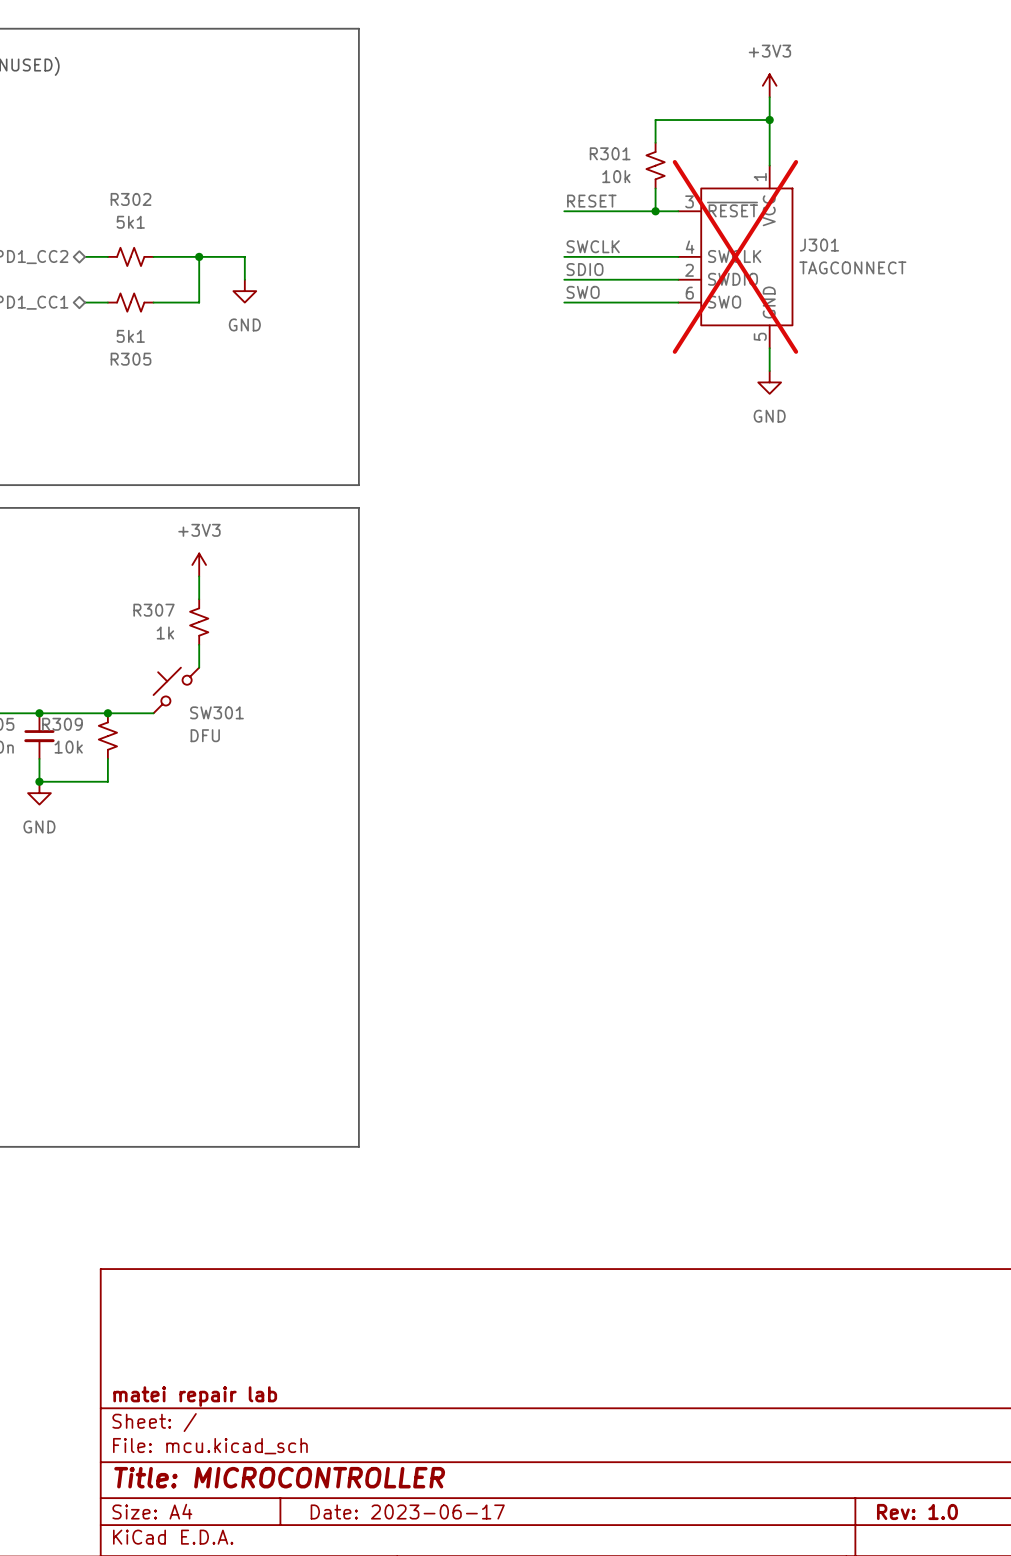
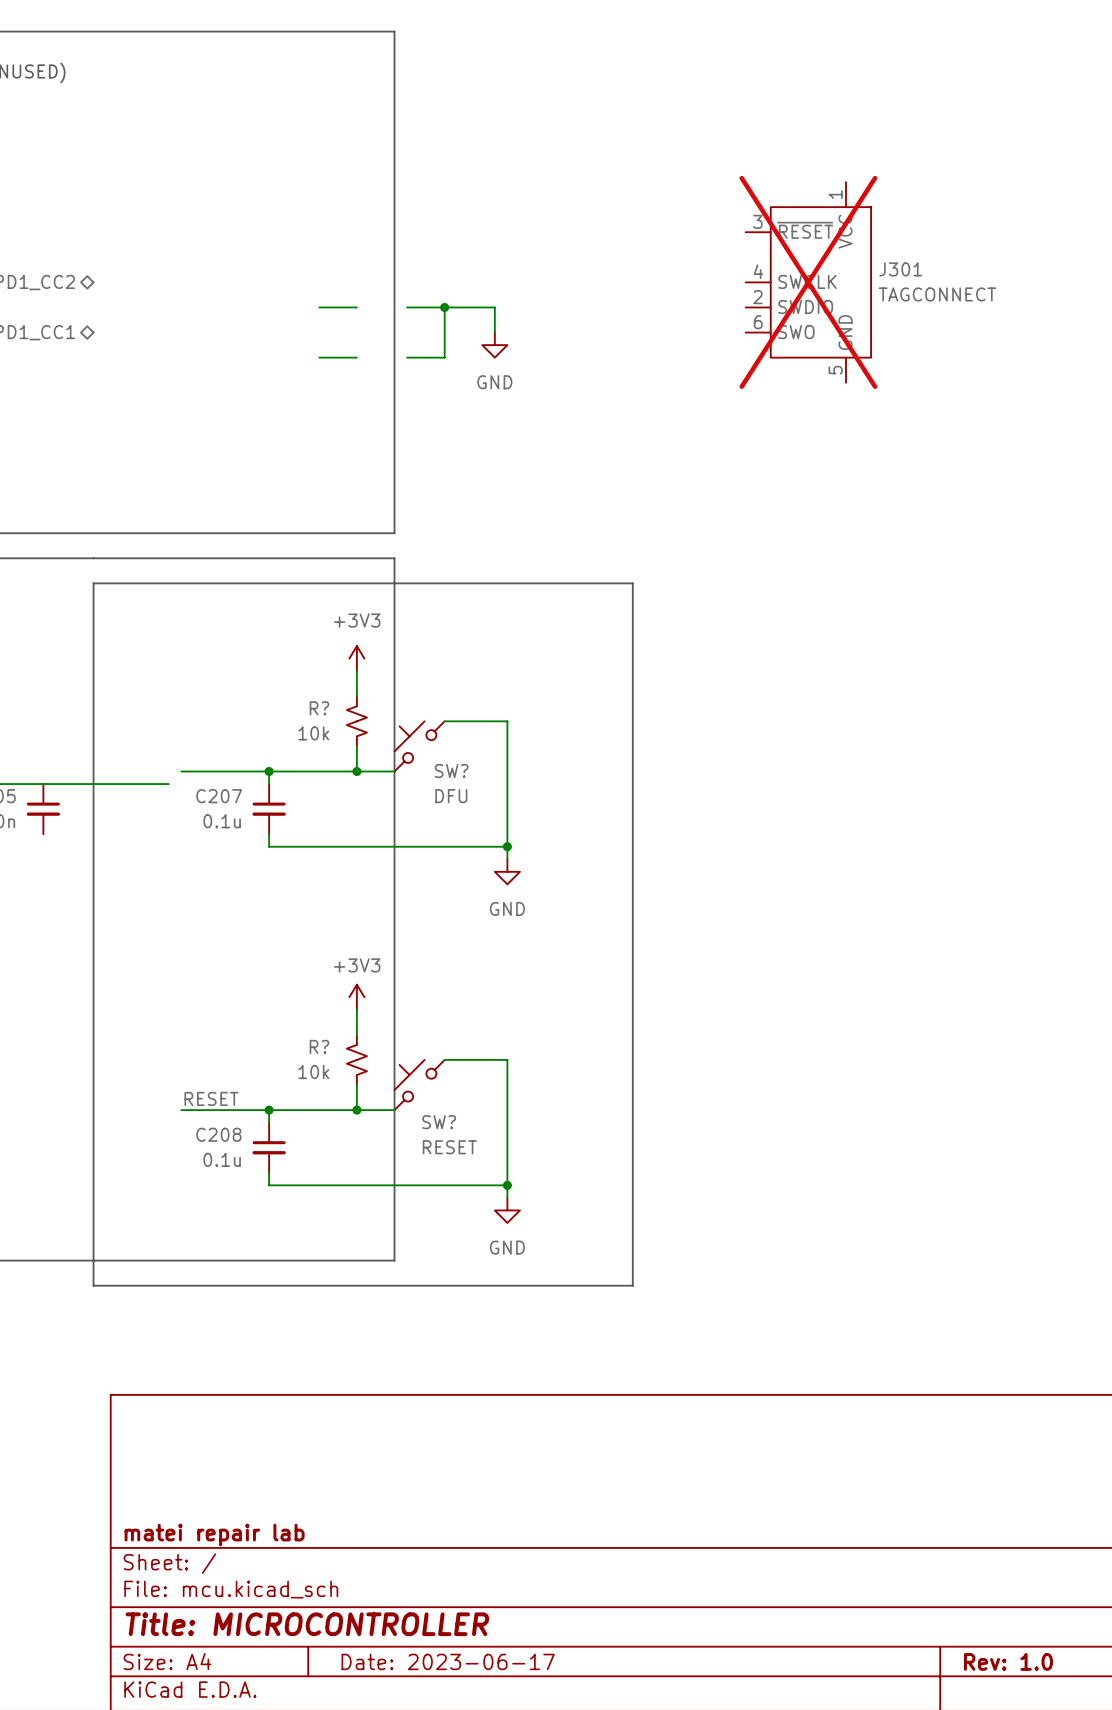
power symbol: +3V3 (769, 85) -> none
wire: (769, 97) (769, 165) -> none
wire: (769, 120) (655, 120) (655, 142) -> none
junction: (769, 120) -> none
R301: 10k (655, 165) -> none
wire: (655, 188) (655, 211) -> none
label: RESET (591, 201) -> none
wire: (564, 211) (678, 211) -> none
junction: (655, 211) -> none
label: SWCLK (593, 246) -> none
wire: (85, 256) (107, 256) -> none
R302: 5k1 (130, 256) -> none
wire: (153, 256) (244, 256) (244, 279) -> none
wire: (199, 256) (199, 302) (153, 302) -> none
junction: (199, 256) -> none
wire: (564, 256) (678, 256) -> none
label: SDIO (585, 269) -> none
wire: none -> (319, 307) (356, 307)
wire: none -> (407, 307) (494, 307) (494, 332)
wire: none -> (444, 307) (444, 357) (407, 357)
junction: none -> (444, 307)
wire: (564, 279) (678, 279) -> none
power symbol: GND (244, 291) -> none
label: SWO (583, 292) -> none
wire: (85, 302) (107, 302) -> none
R305: 5k1 (130, 302) -> none
wire: (564, 302) (678, 302) -> none
power symbol: none -> GND (494, 345)
wire: none -> (319, 357) (356, 357)
wire: (769, 348) (769, 371) -> none
power symbol: GND (769, 382) -> none
line: none -> (93, 583) (93, 1285) (632, 1285) (632, 583) (93, 583)
power symbol position: +3V3 (199, 564) -> +3V3 (356, 658)
wire: (199, 576) (199, 599) -> (356, 671) (356, 696)
R307: 1k (199, 622) -> none
wire: (199, 644) (199, 667) -> (356, 746) (356, 771)
R?: none -> 10k (356, 721)
wire: none -> (444, 721) (507, 721) (507, 859)
SW?: none -> DFU (419, 746)
SW301: DFU (176, 690) -> none
wire: none -> (181, 771) (394, 771)
wire: none -> (269, 771) (269, 784)
junction: none -> (269, 771)
junction: none -> (356, 771)
junction: (39, 713) -> none
junction: (107, 713) -> none
R309: 10k (107, 736) -> none
C207: none -> 0.1u (269, 809)
wire: (39, 758) (39, 781) (107, 781) (107, 758) -> none
wire: none -> (269, 834) (269, 846) (507, 846)
junction: none -> (507, 846)
junction: (39, 781) -> none
power symbol: GND (39, 793) -> none
power symbol: none -> GND (507, 871)
power symbol: none -> +3V3 (356, 997)
wire: none -> (356, 1009) (356, 1034)
R?: none -> 10k (356, 1059)
wire: none -> (444, 1059) (507, 1059) (507, 1197)
wire: none -> (356, 1085) (356, 1110)
SW?: none -> RESET (419, 1085)
label: none -> RESET (211, 1098)
wire: none -> (181, 1110) (394, 1110)
wire: none -> (269, 1110) (269, 1122)
junction: none -> (269, 1110)
junction: none -> (356, 1110)
C208: none -> 0.1u (269, 1147)
wire: none -> (269, 1172) (269, 1185) (507, 1185)
junction: none -> (507, 1185)
power symbol: none -> GND (507, 1210)

